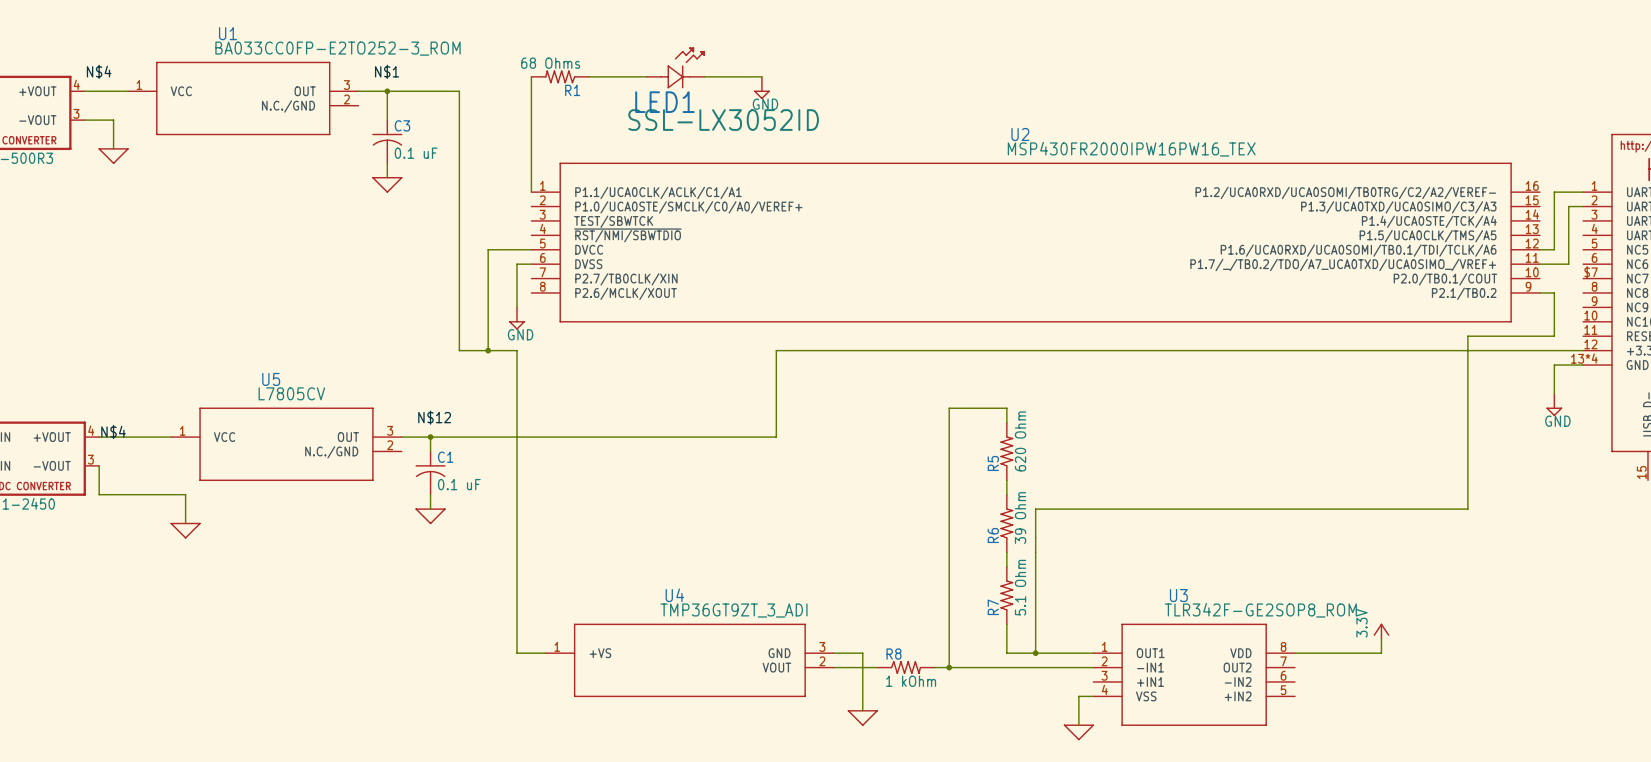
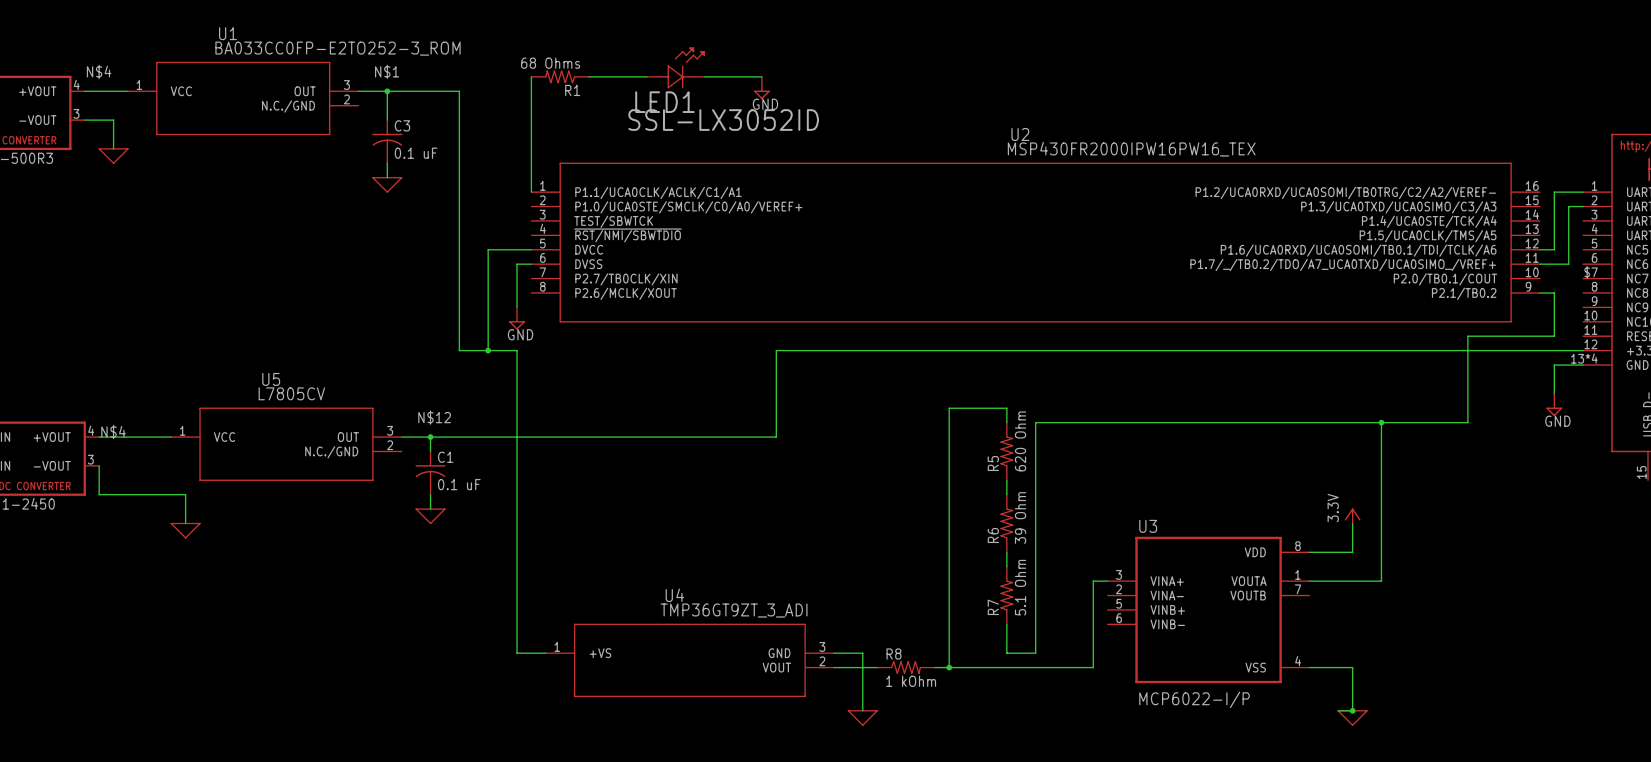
wire: none -> (1381, 422) (1381, 581) (1309, 581)
junction: none -> (1381, 422)
wire: (1467, 422) (1467, 509) (1035, 509) -> (1467, 422) (1035, 422) (1035, 509)
wire: none -> (1352, 523) (1352, 552) (1309, 552)
wire: none -> (1107, 581) (1093, 581) (1093, 667)
U3 name position: U3 (1178, 595) -> U3 (1148, 526)
U3 value: TLR342F-GE2SOP8_ROM (1260, 610) -> MCP6022-I/P (1194, 699)
U3 symbol: [1093, 623, 1296, 726] -> [1107, 536, 1310, 684]
power symbol position: 3.3V (1381, 631) -> 3.3V (1352, 515)
wire: (1381, 638) (1381, 653) (1295, 653) -> none
wire: (1035, 653) (1093, 653) -> none
junction: (1035, 653) -> none
wire: none -> (1309, 667) (1352, 667) (1352, 710) (1338, 710)
wire: (1093, 696) (1078, 696) (1078, 725) -> none
junction: none -> (1352, 710)
power symbol: none -> (1352, 718)
power symbol: (1078, 732) -> none

